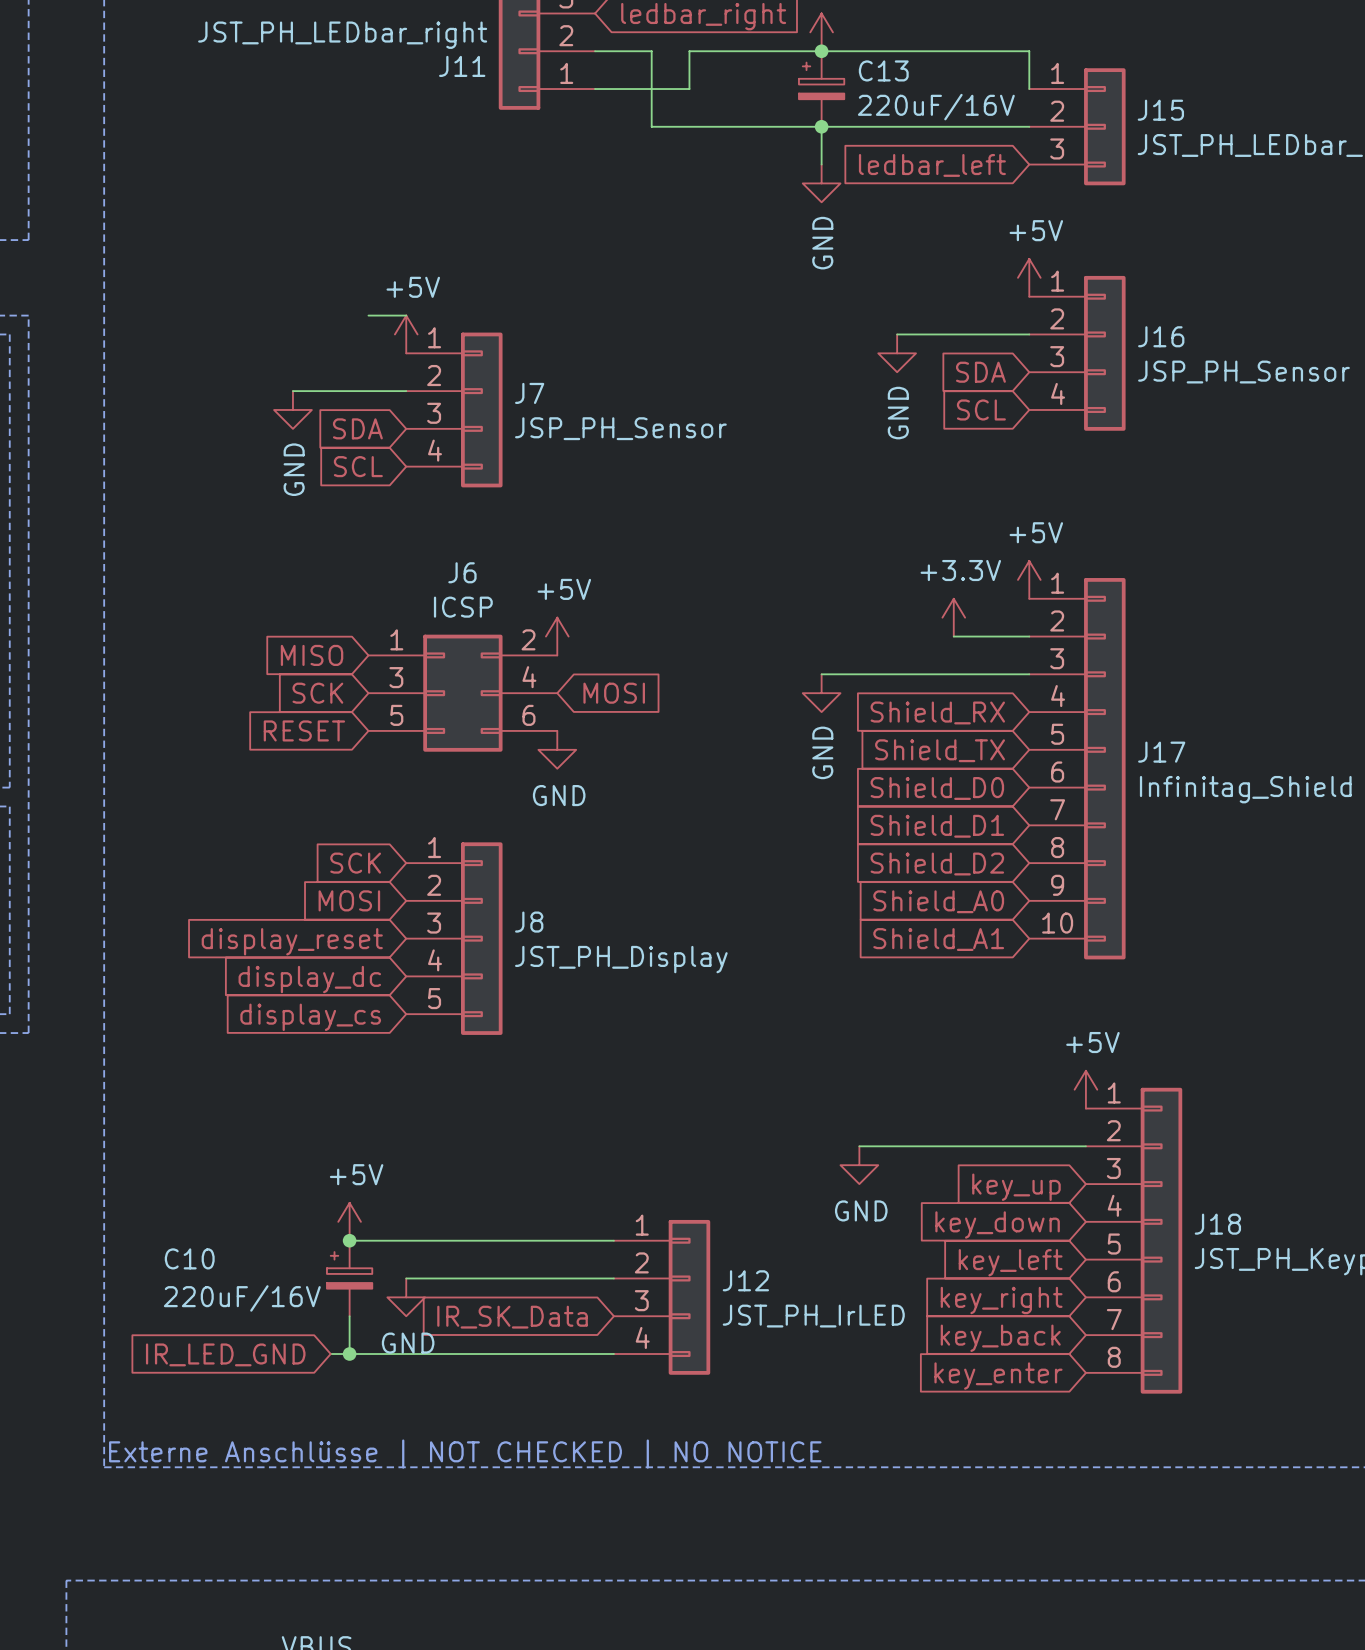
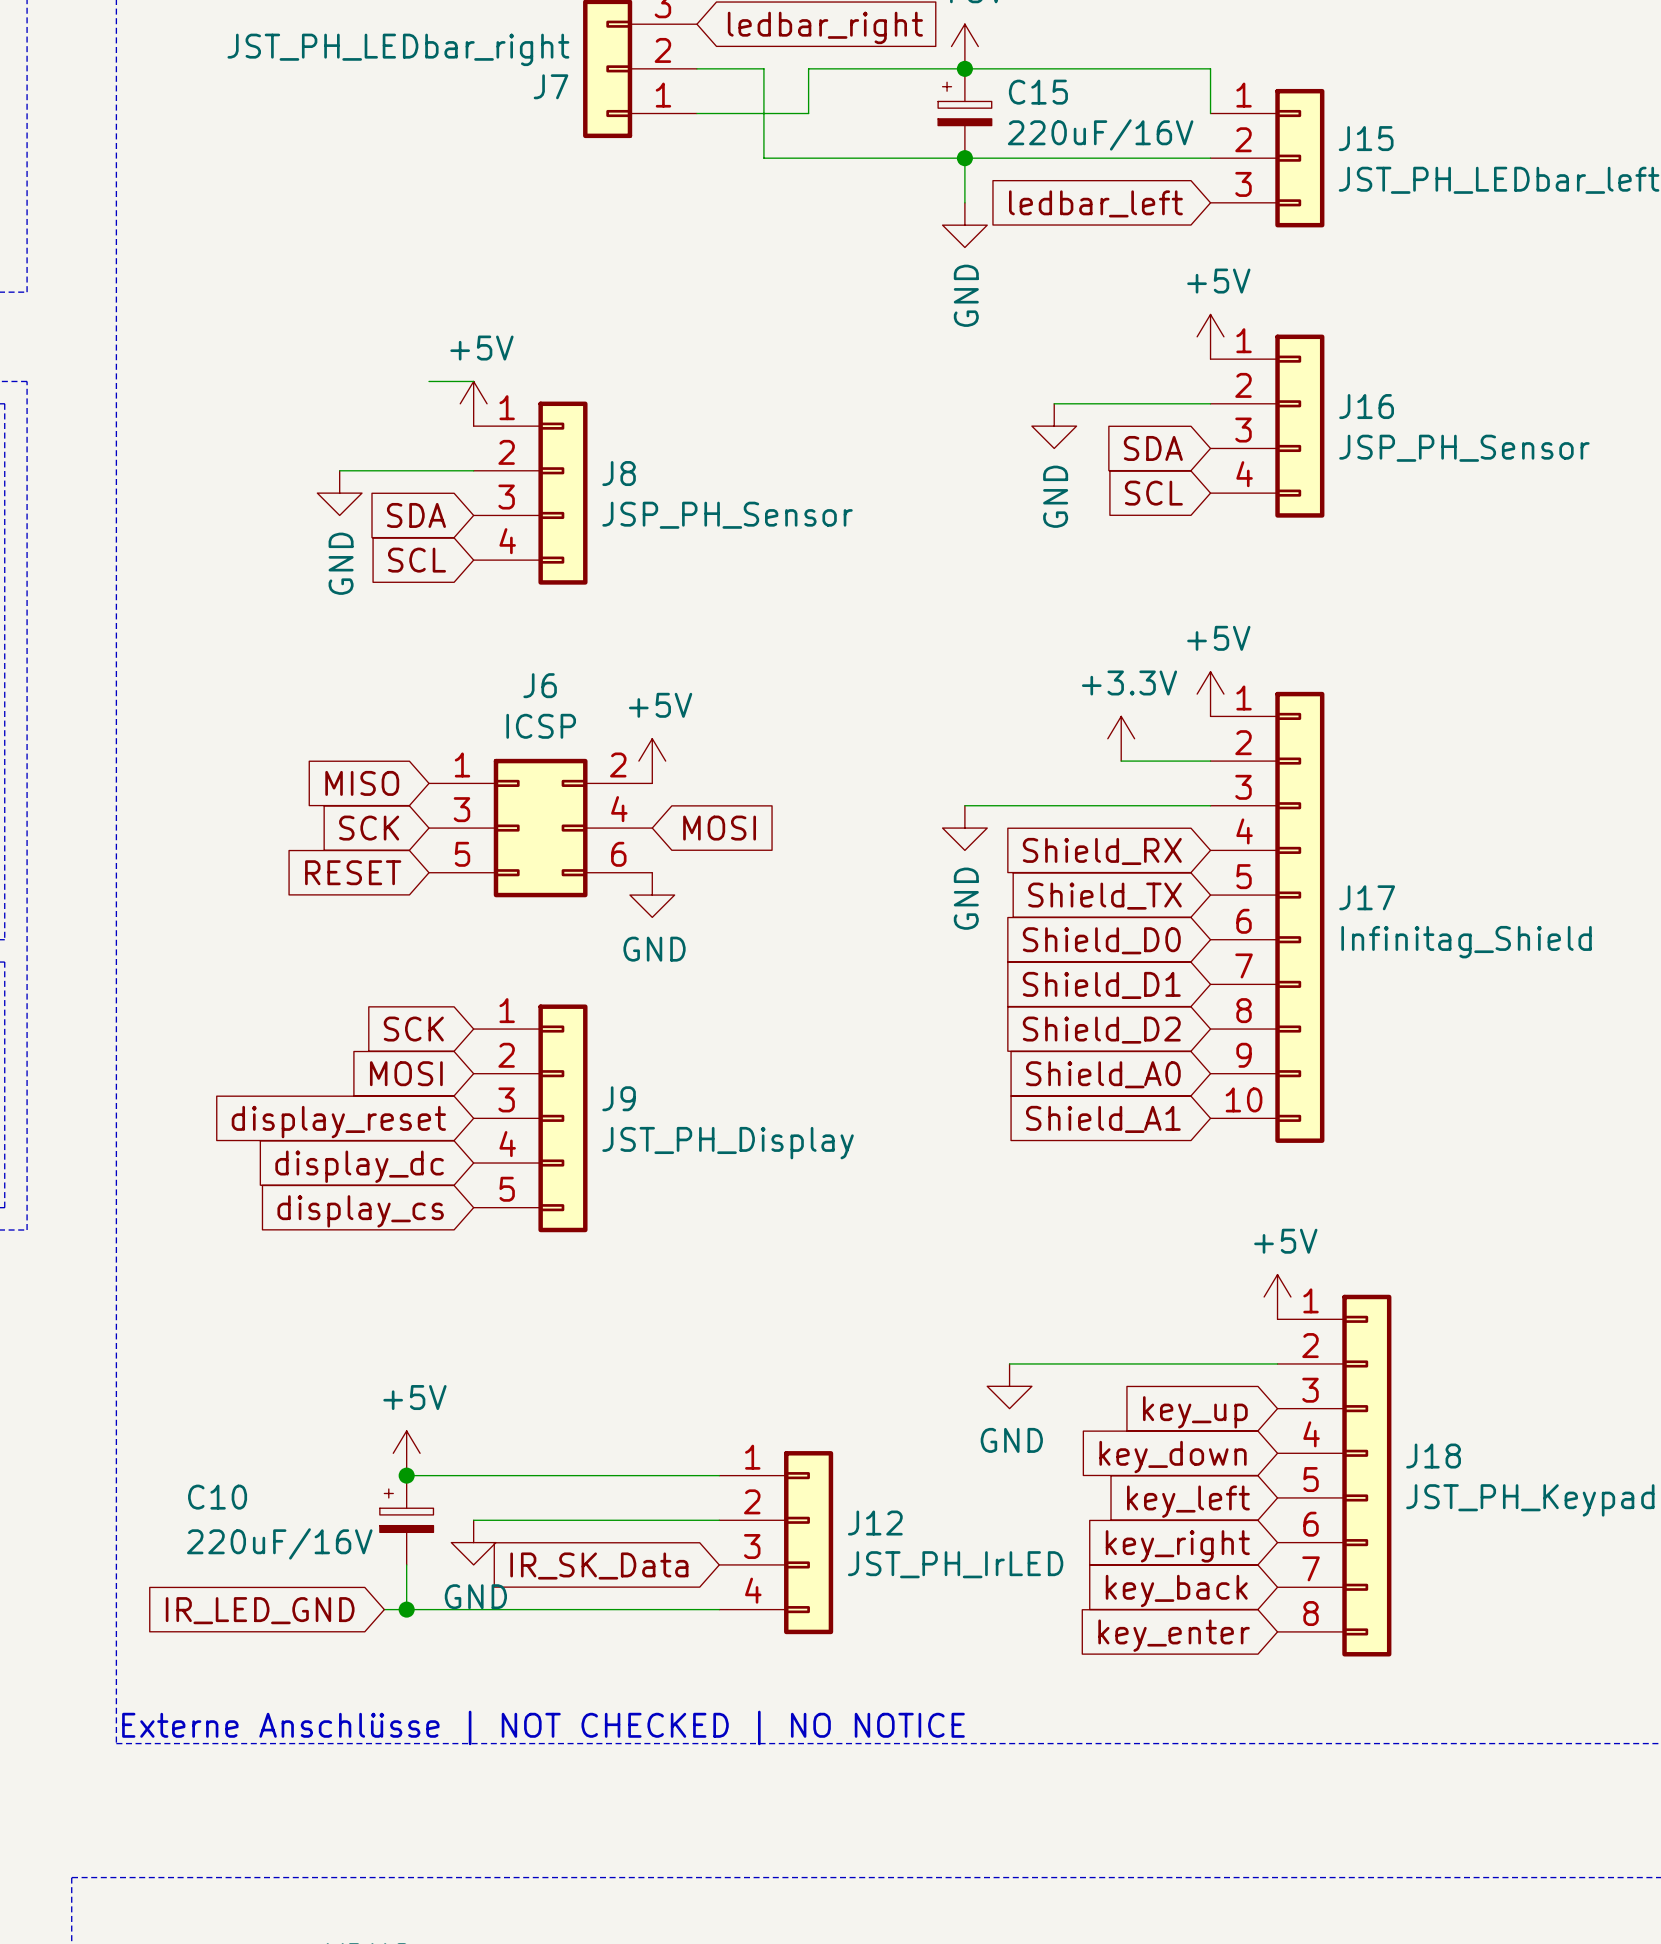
J11 name: J11 (462, 66) -> J7 (551, 86)
C13 name: C13 (883, 70) -> C15 (1038, 92)
J7 name: J7 (529, 393) -> J8 (619, 473)
J8 name: J8 (529, 922) -> J9 (619, 1098)

